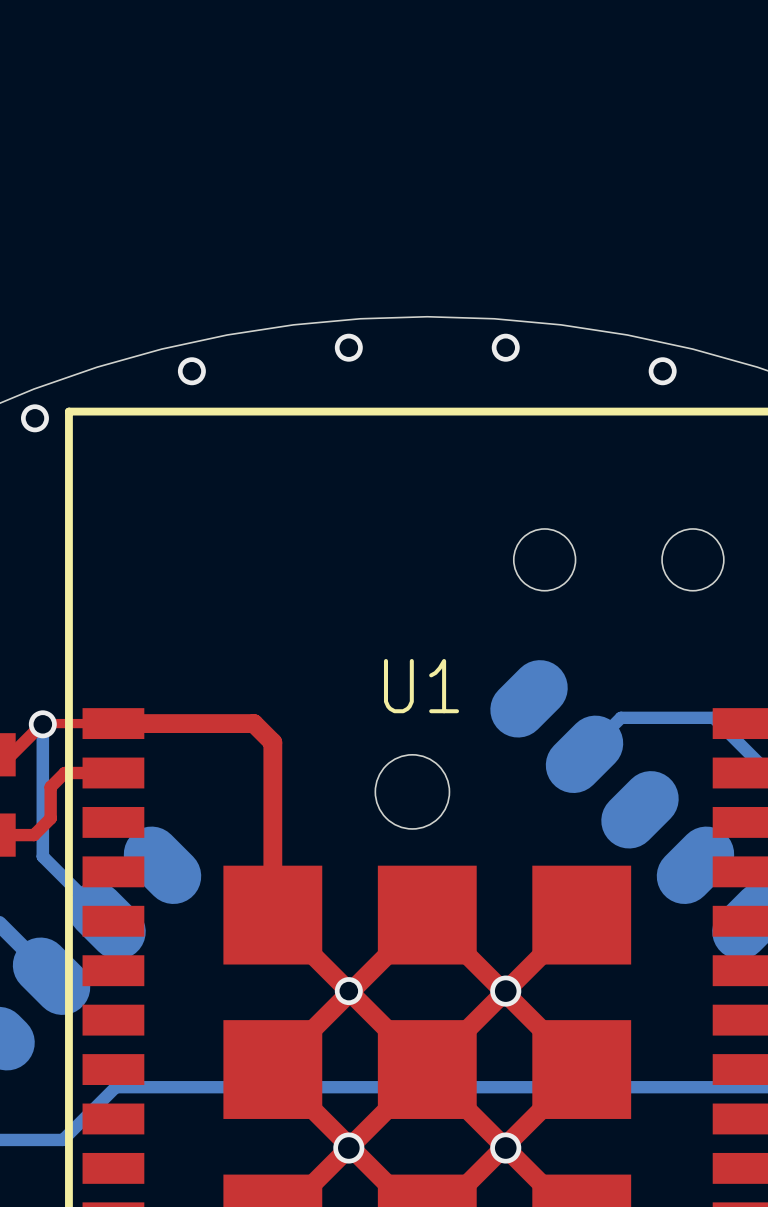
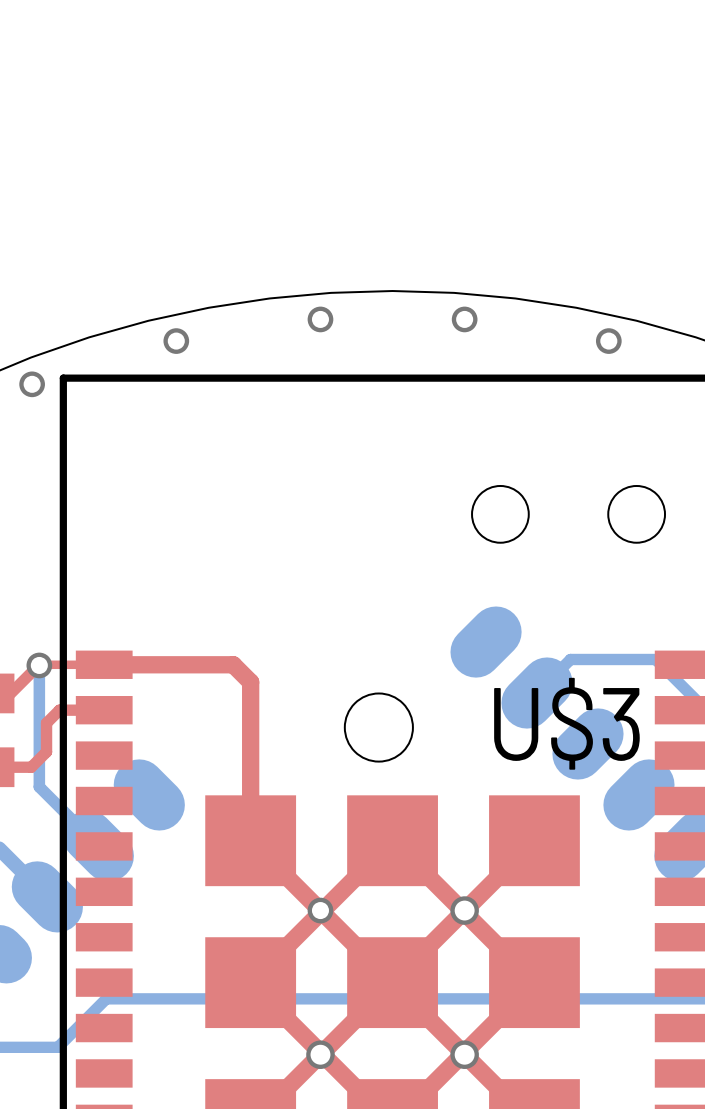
U1 name: U1 (421, 686) -> U$3 (566, 723)

